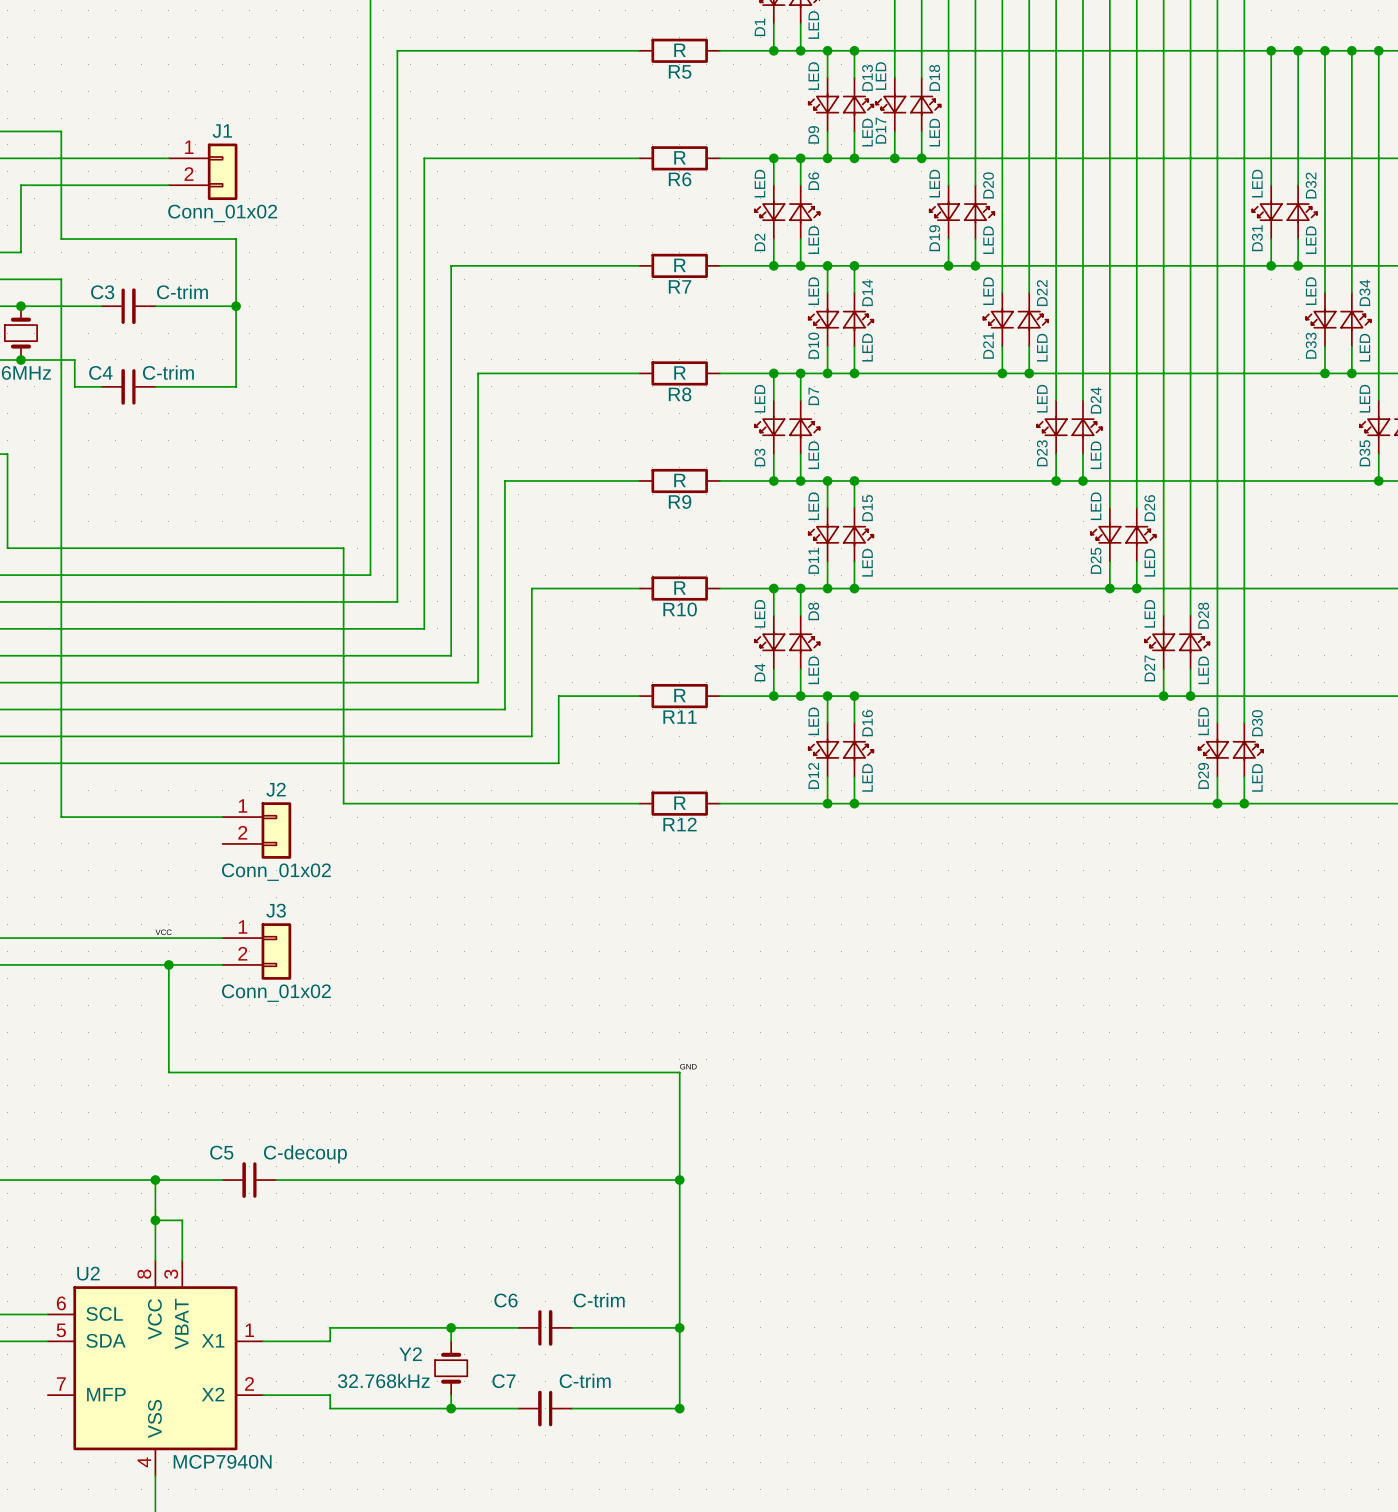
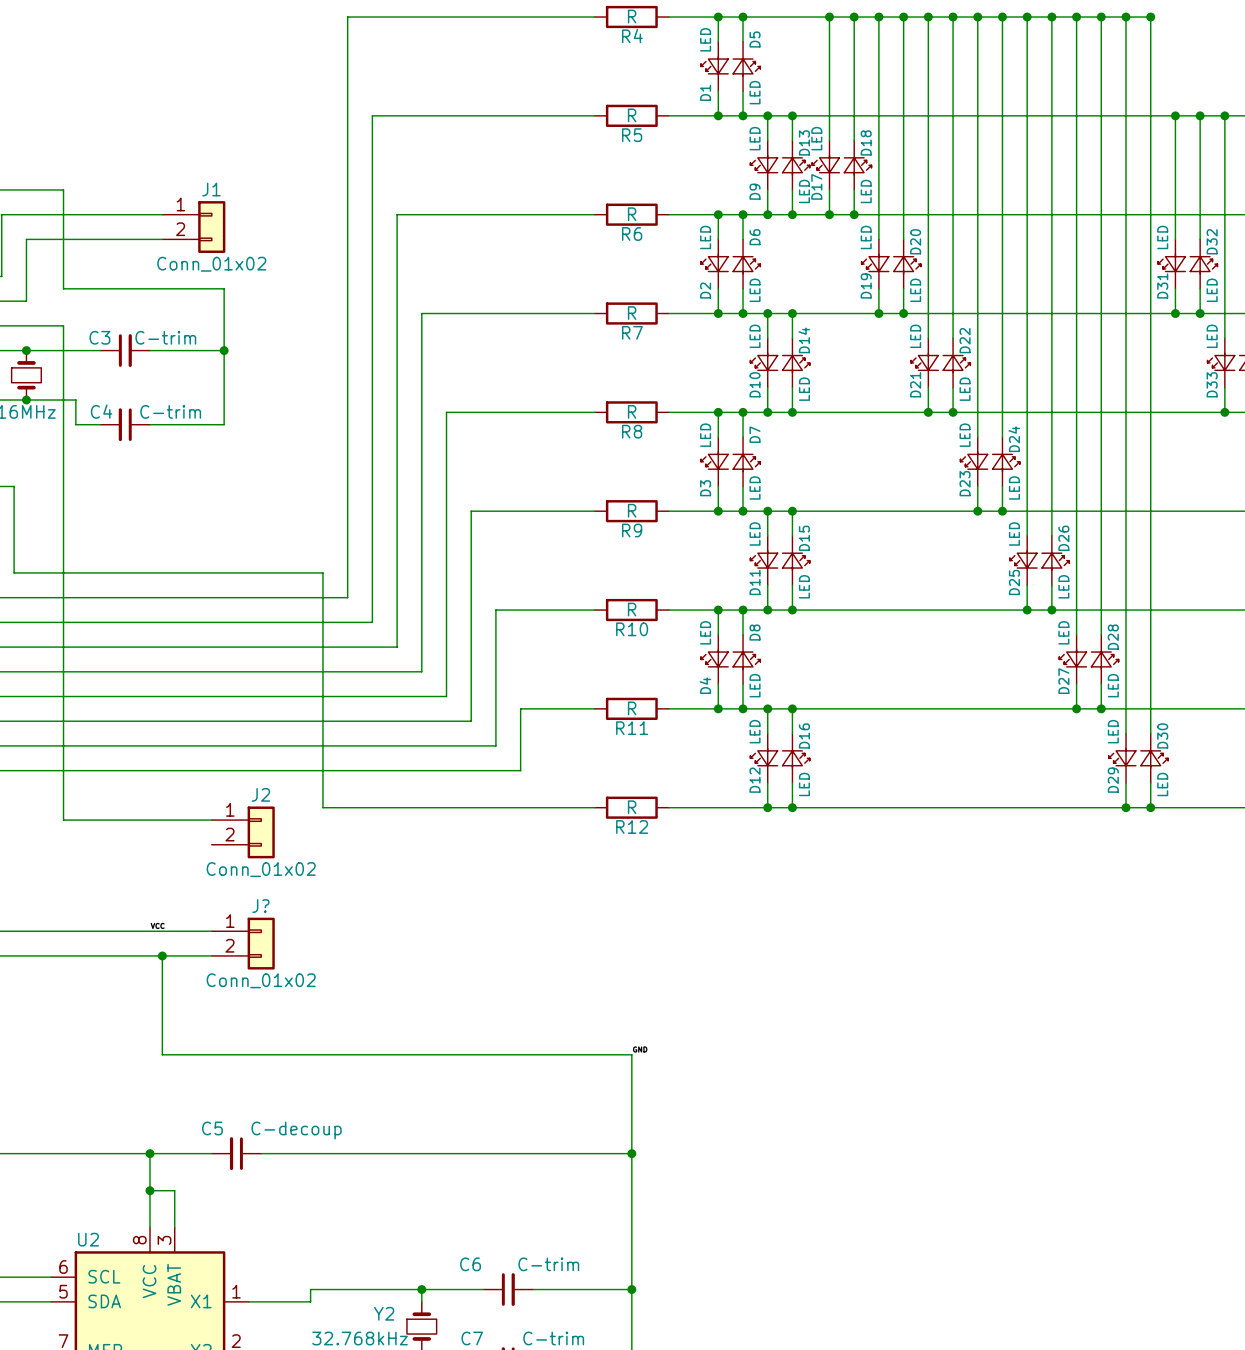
J3 name: J3 (276, 910) -> J? (260, 906)

